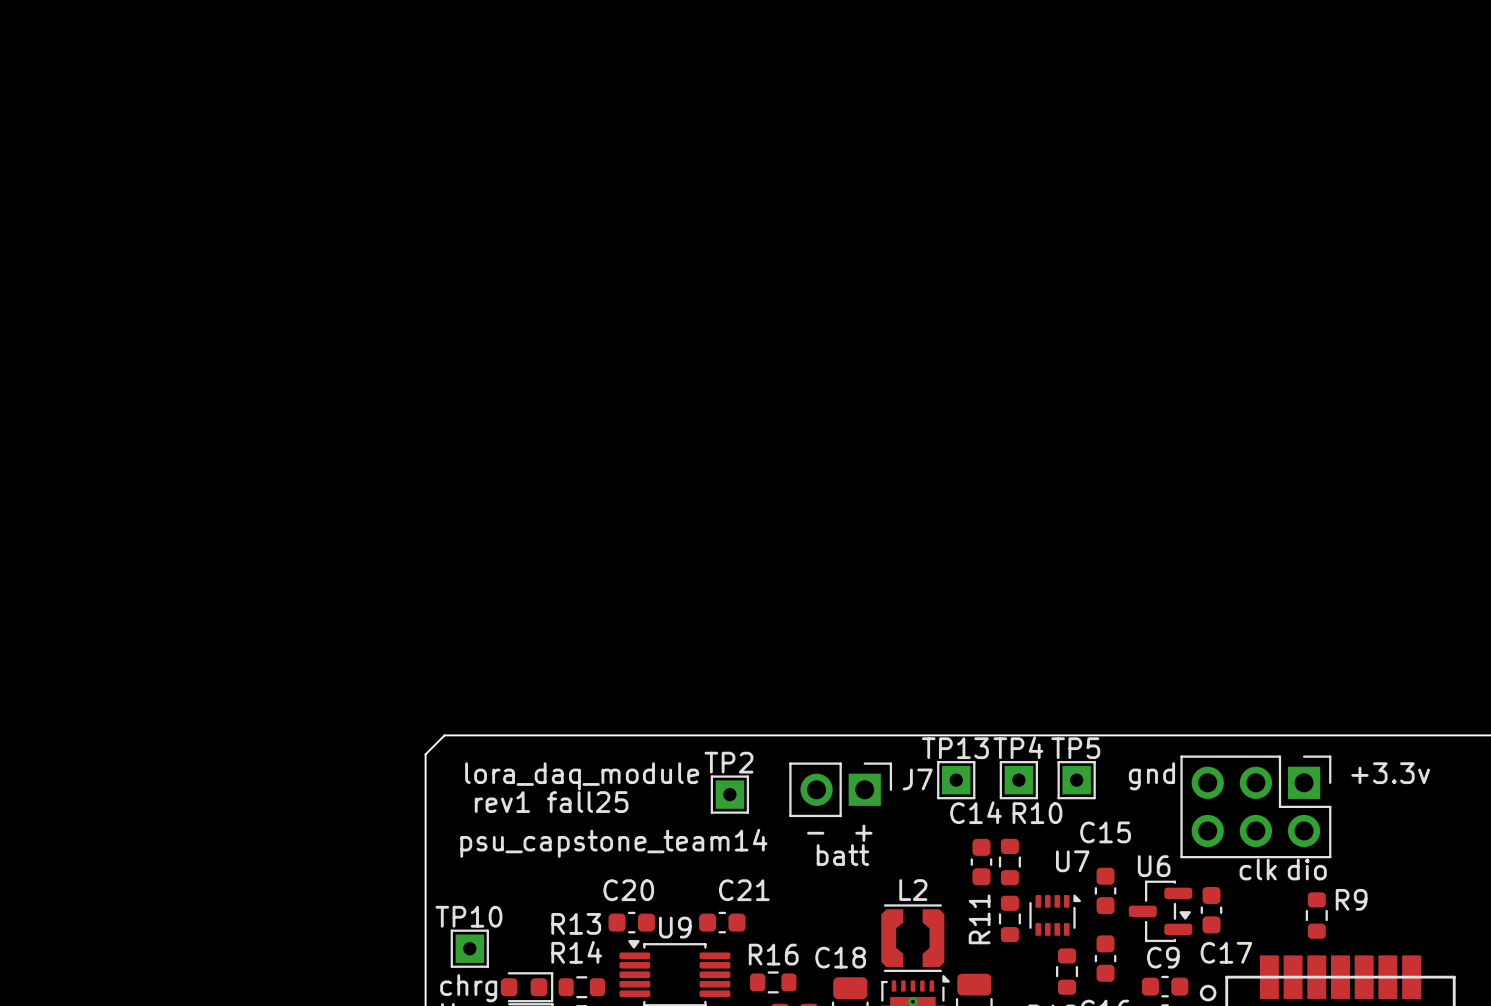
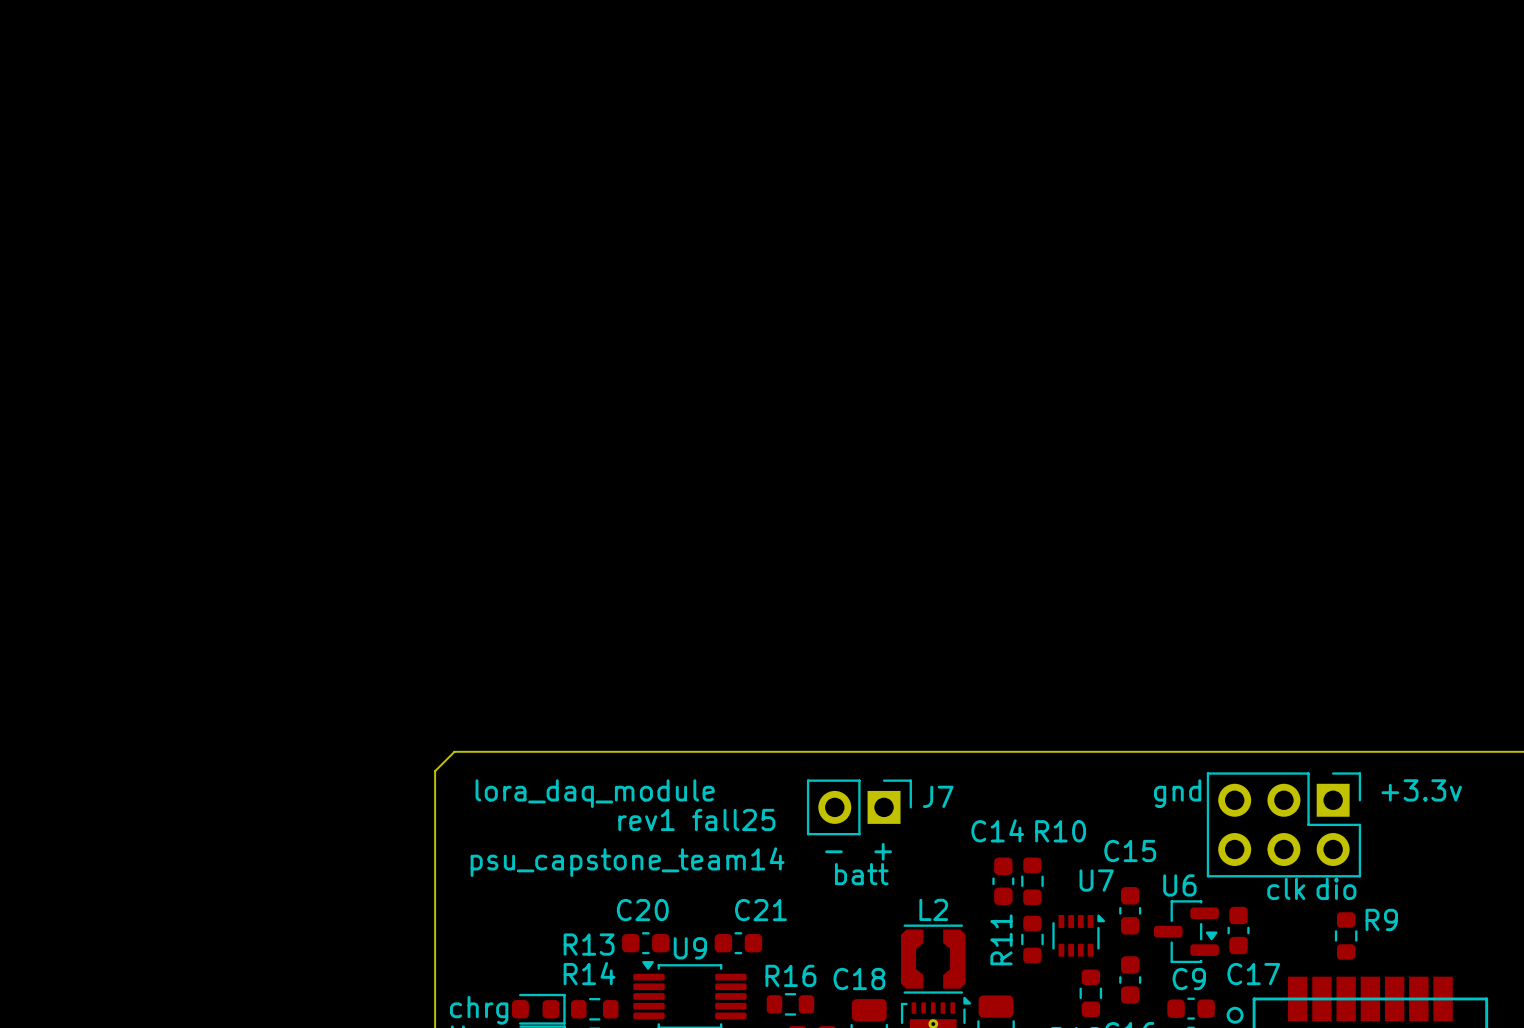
TP13: (956, 780) -> none
TP4: (1018, 780) -> none
TP5: (1076, 780) -> none
TP2: (729, 794) -> none
text position: rev1 fall25 (551, 802) -> rev1 fall25 (696, 819)
TP10: (469, 948) -> none

